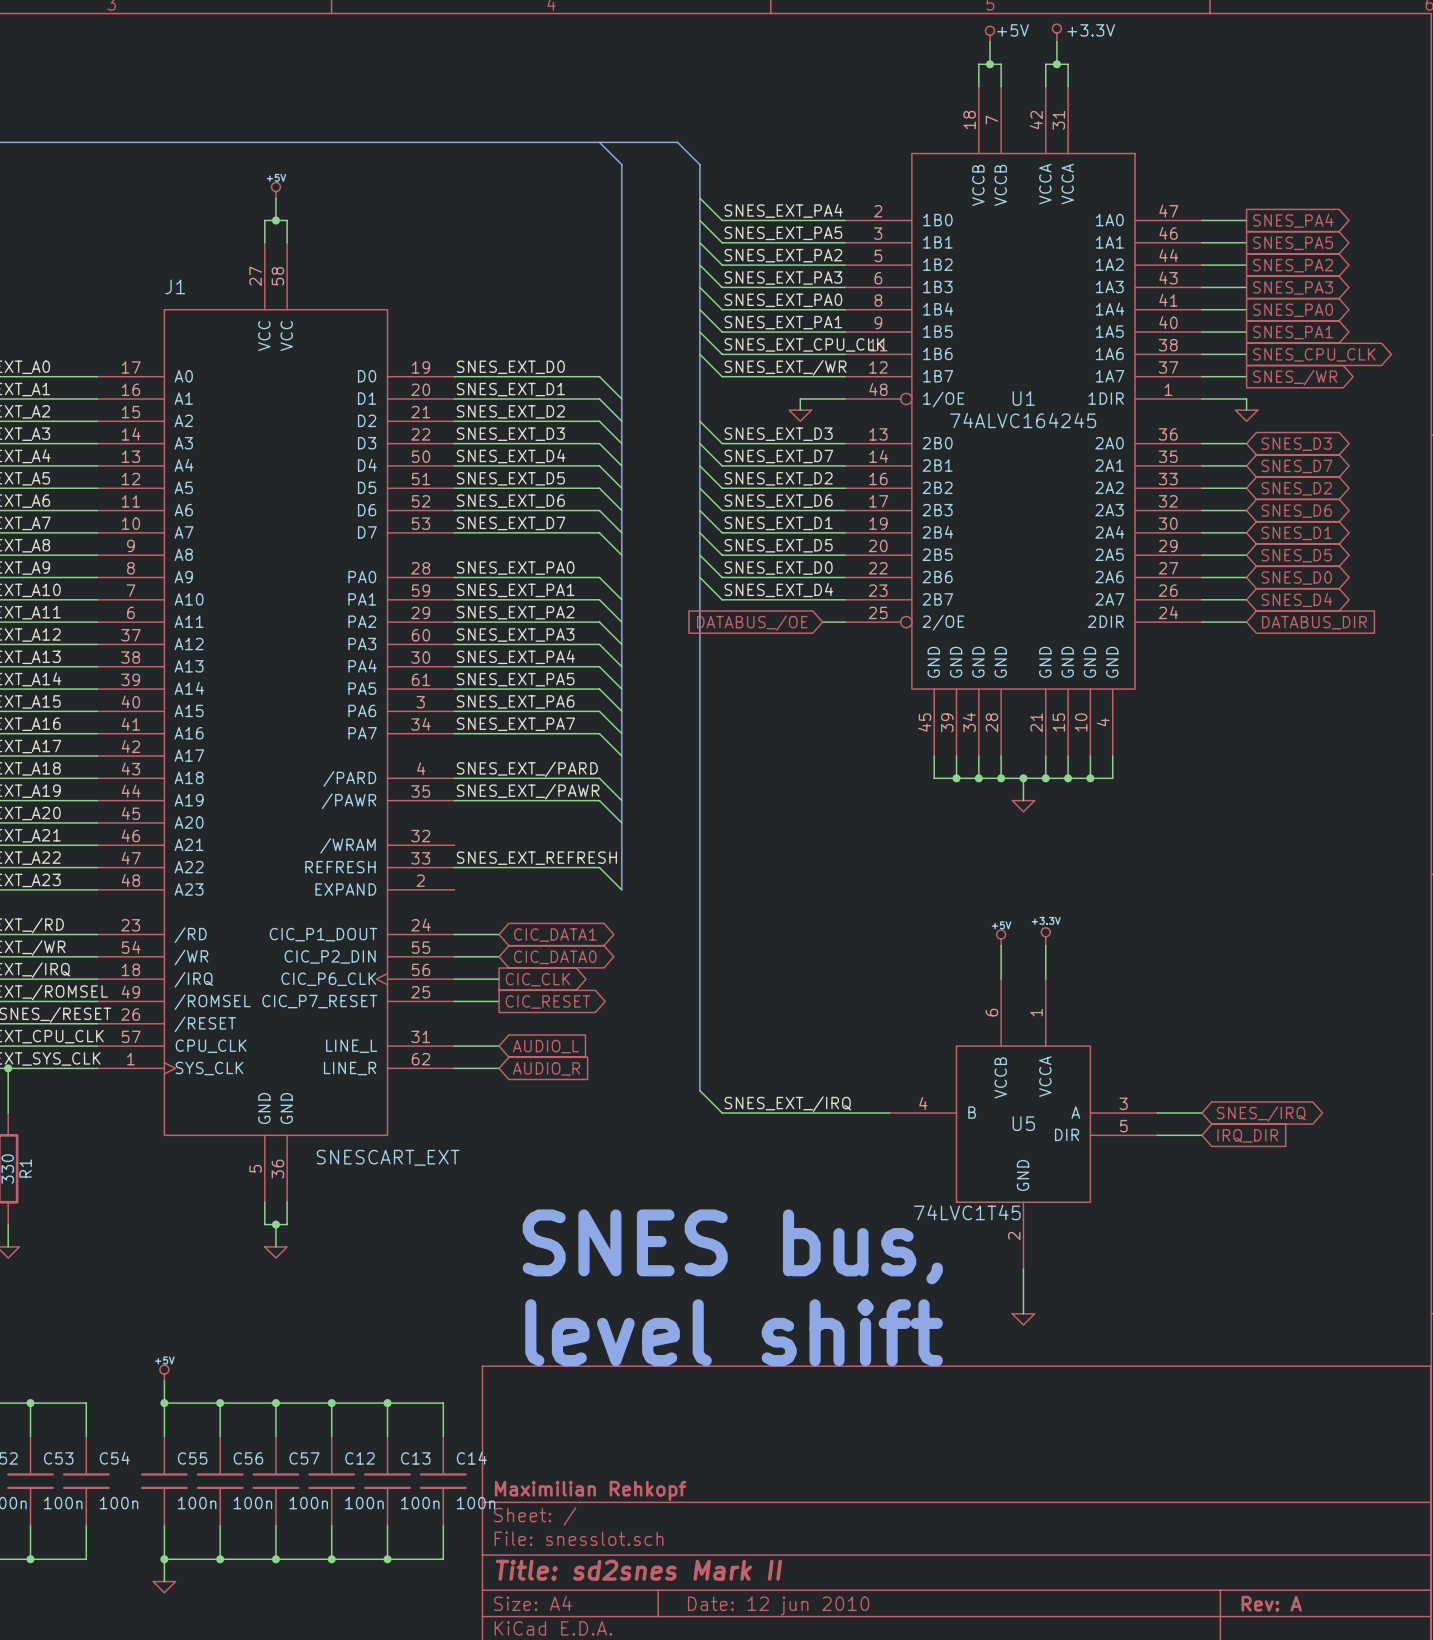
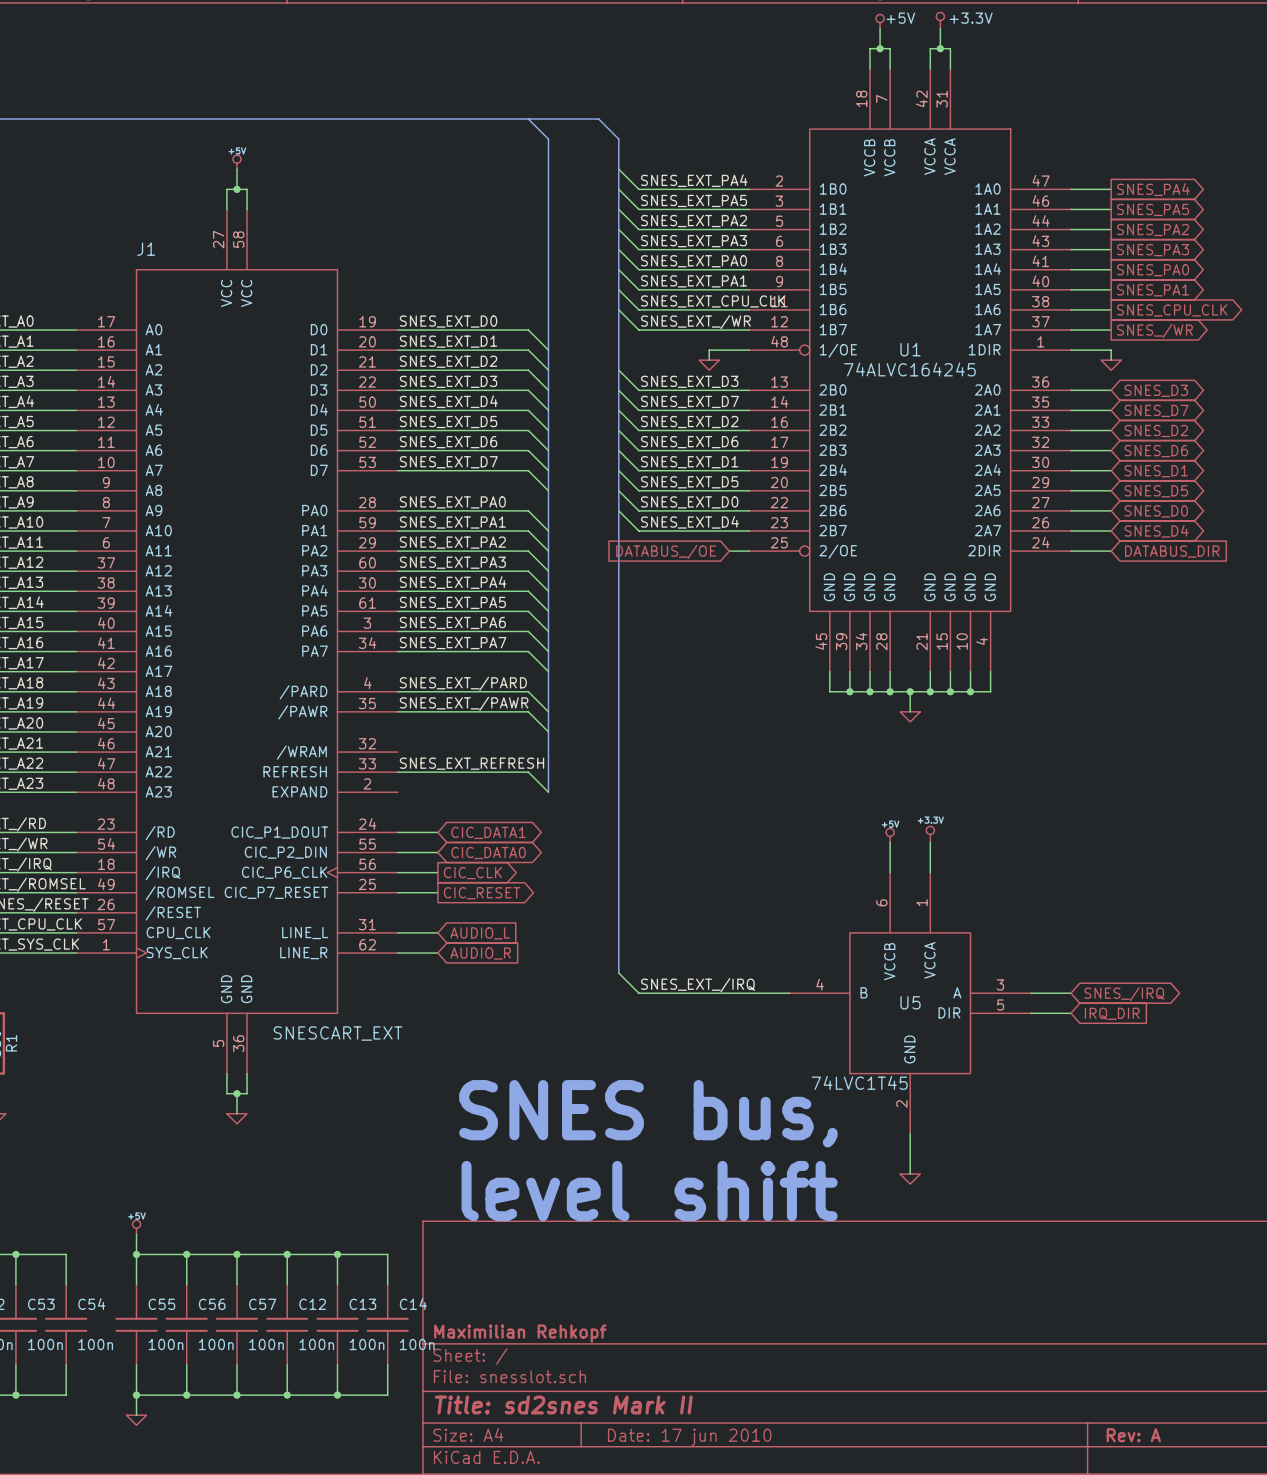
title block: Date: 12 jun 2010 (778, 1605) -> Date: 17 jun 2010 (689, 1437)

